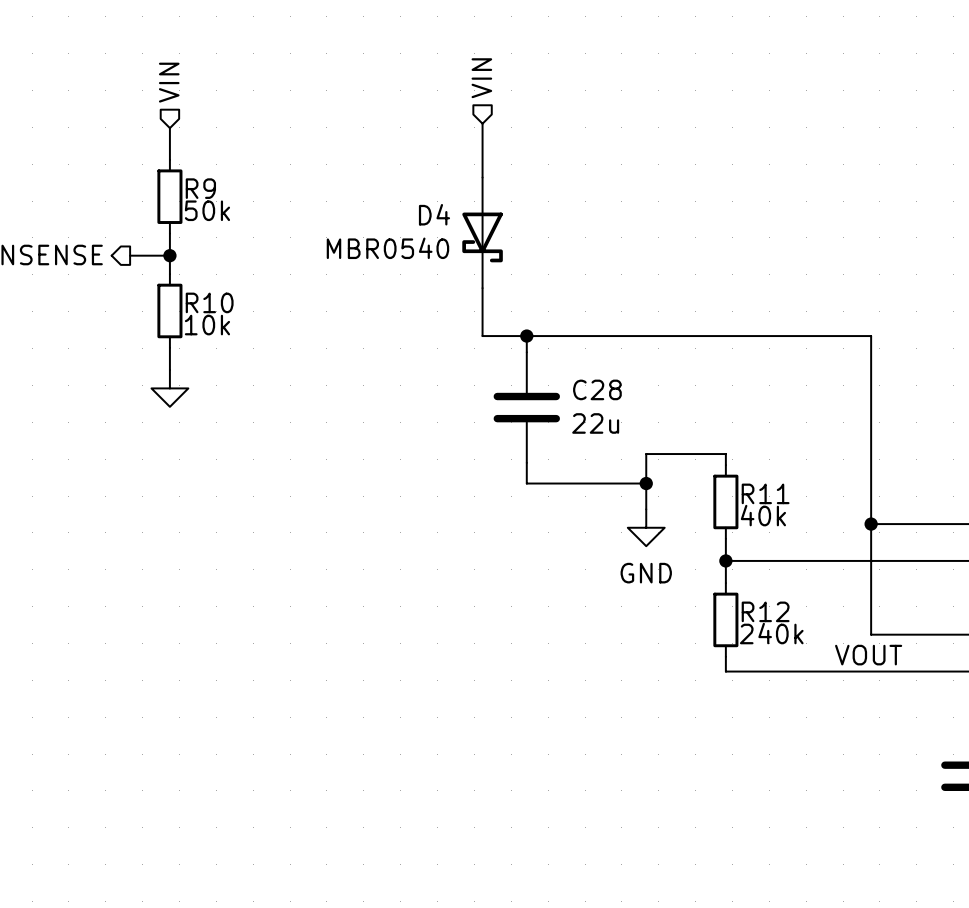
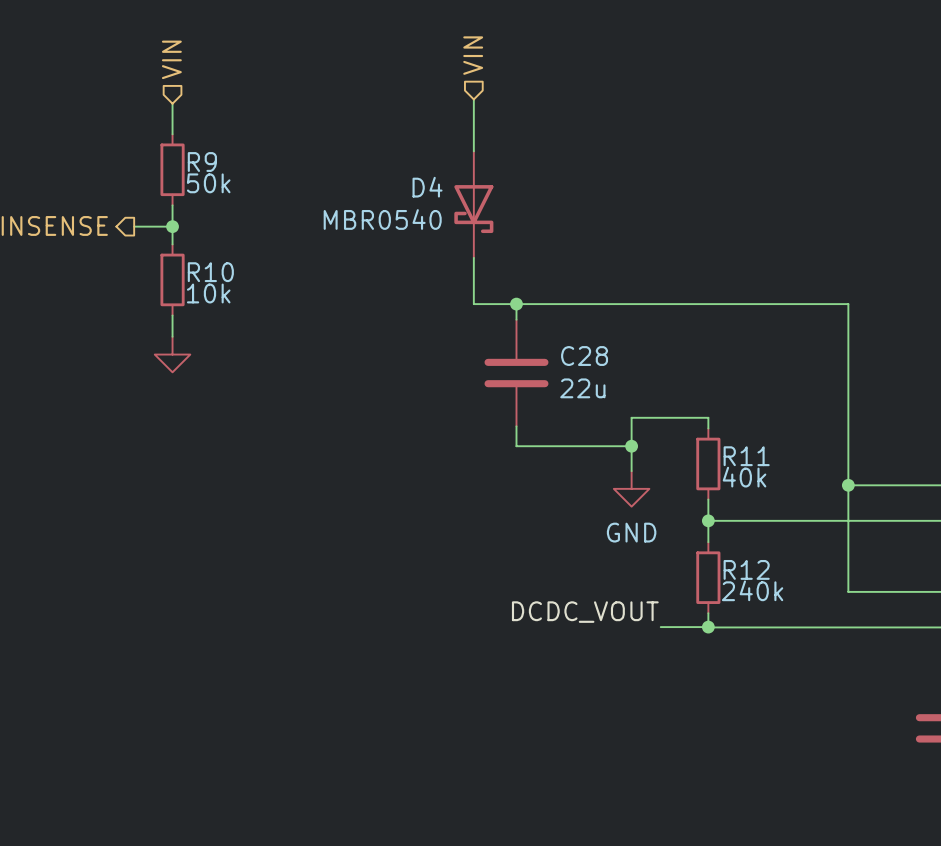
label: none -> DCDC_VOUT (585, 612)
label: VOUT (868, 655) -> none
wire: none -> (660, 627) (708, 627)
junction: none -> (708, 627)

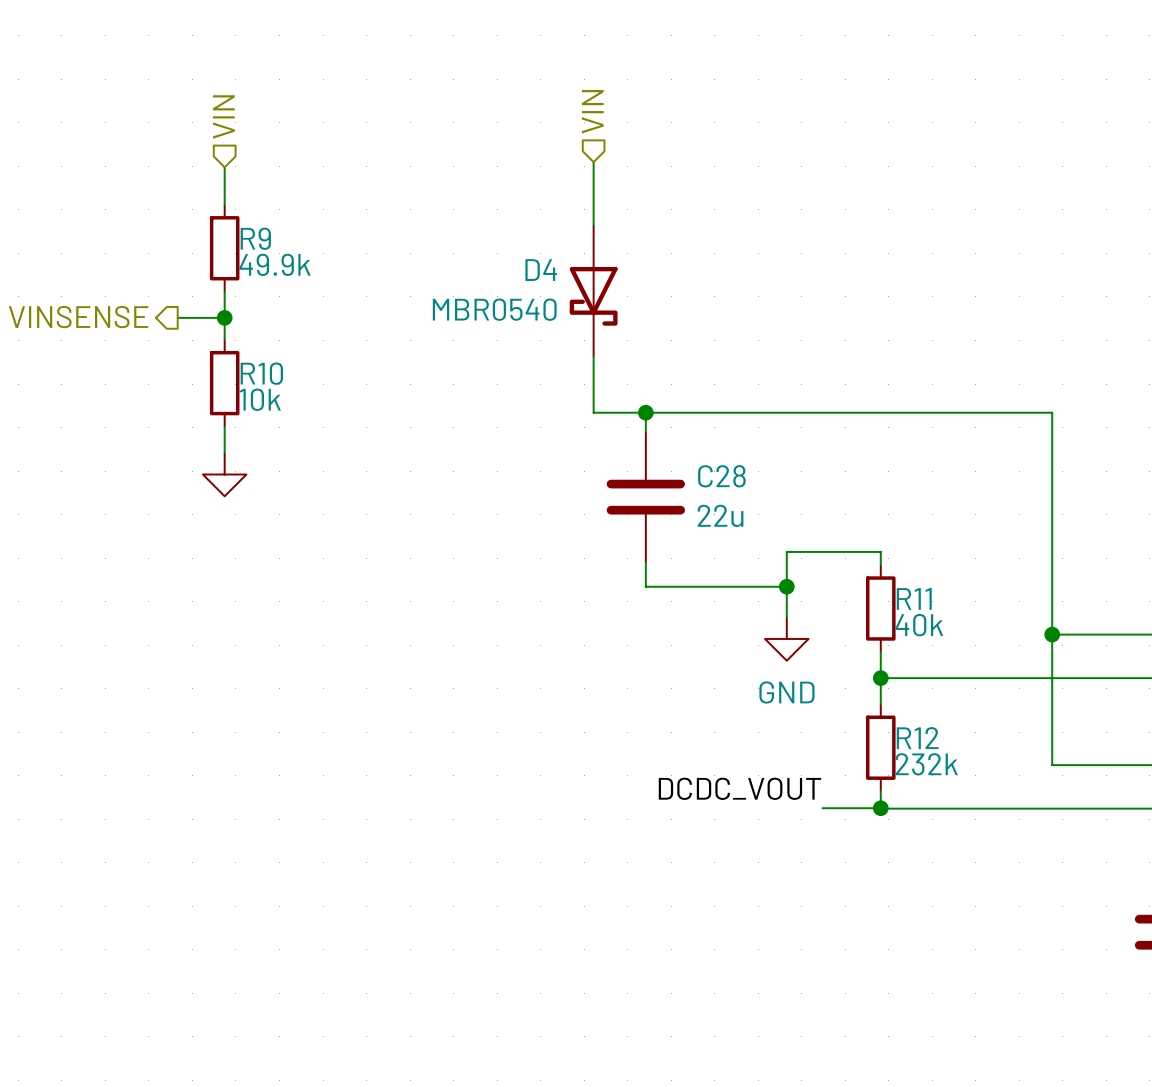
R9 value: 50k (208, 183) -> 49.9k (274, 264)
R12 value: 240k (752, 590) -> 232k (926, 764)

